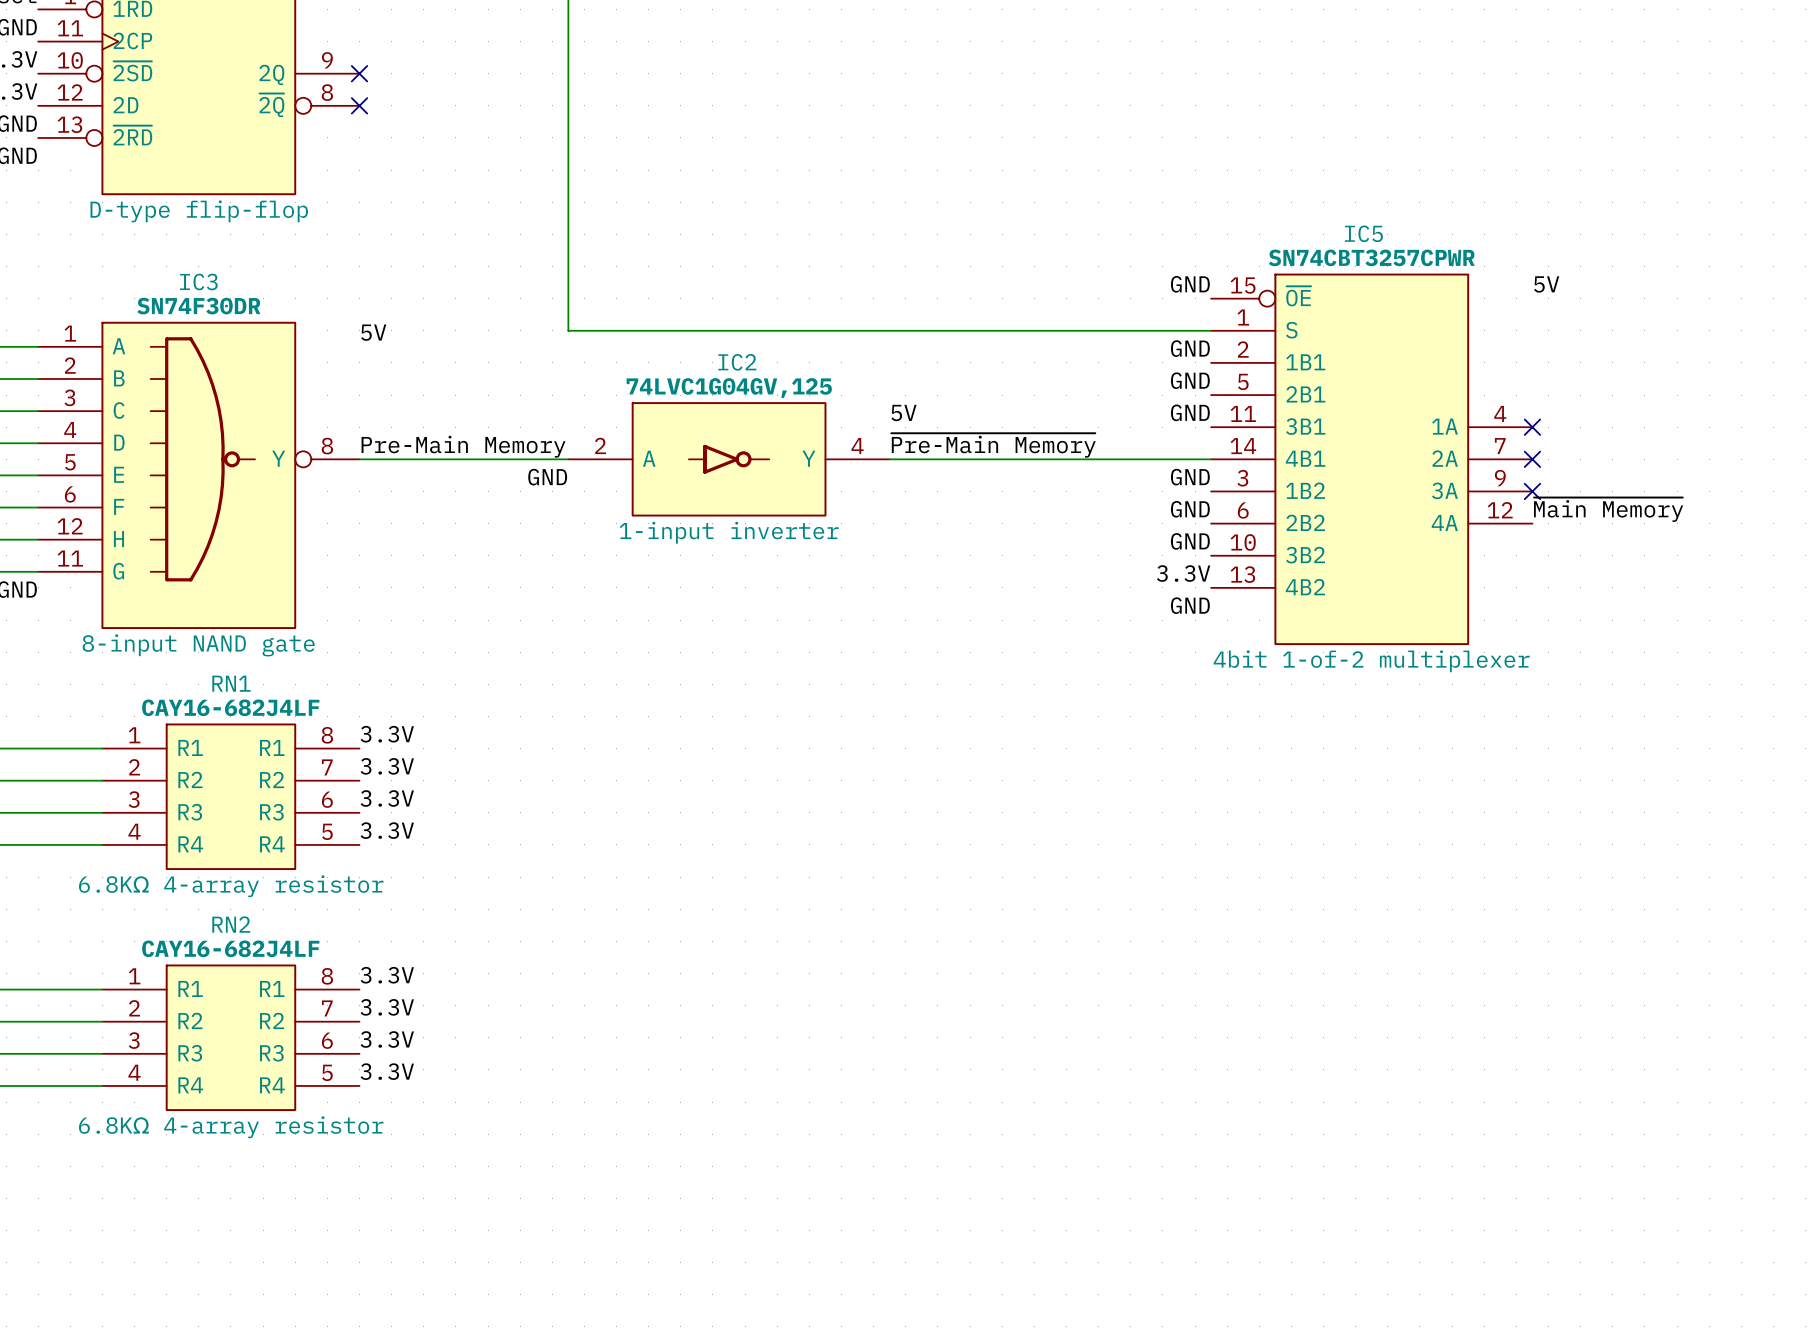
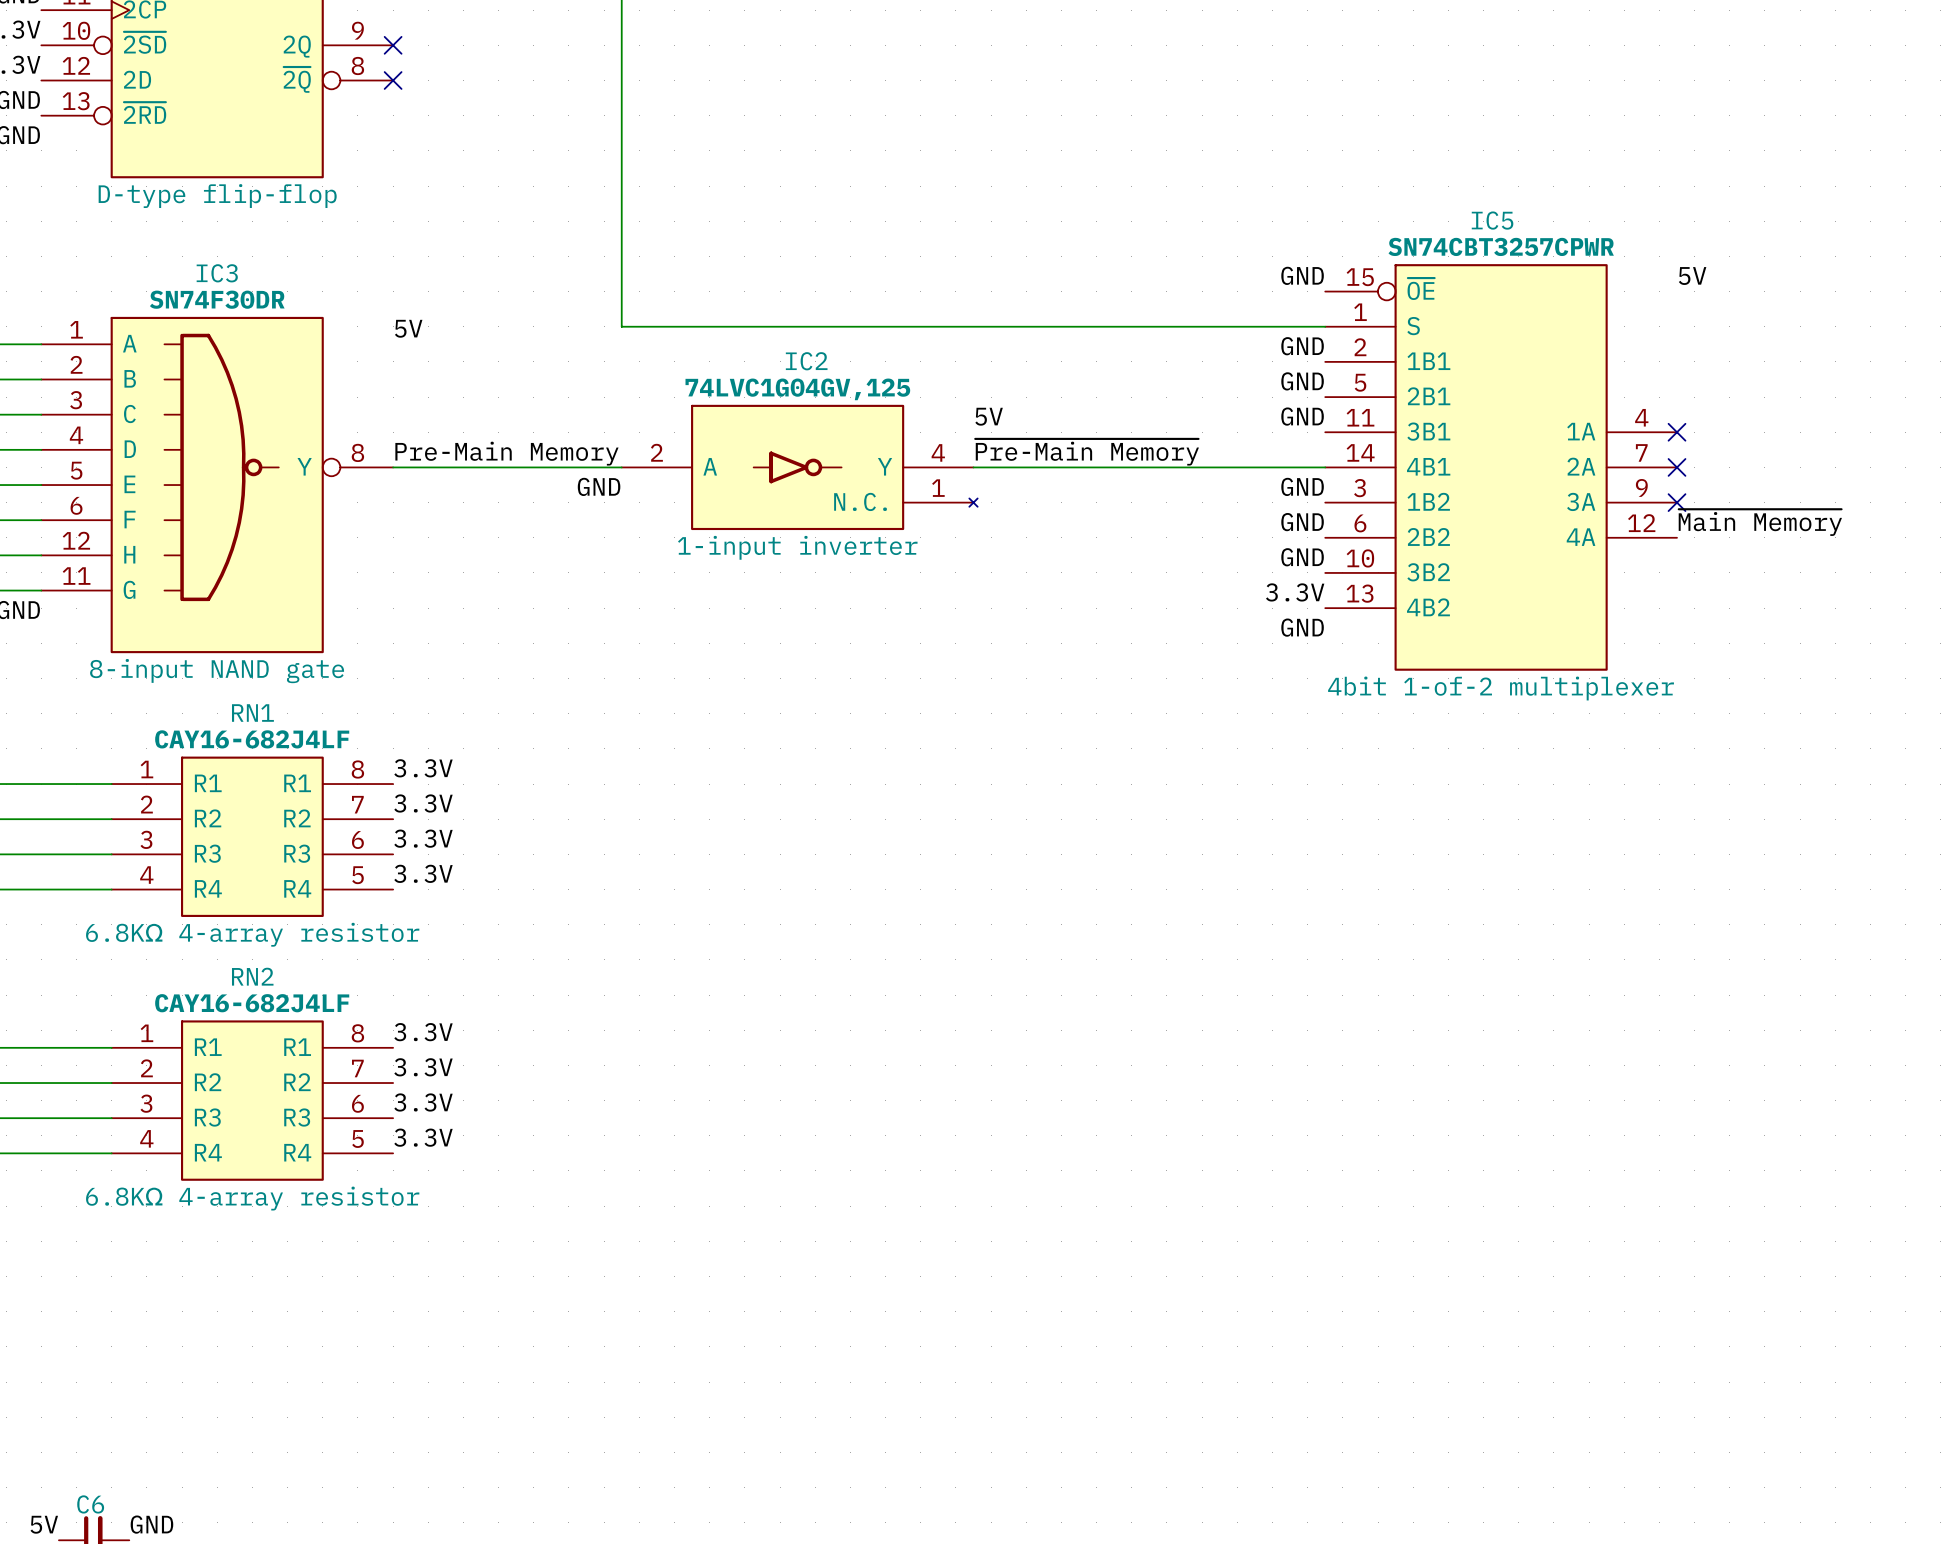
IC2 symbol: [568, 402, 890, 517] -> [621, 404, 978, 531]

